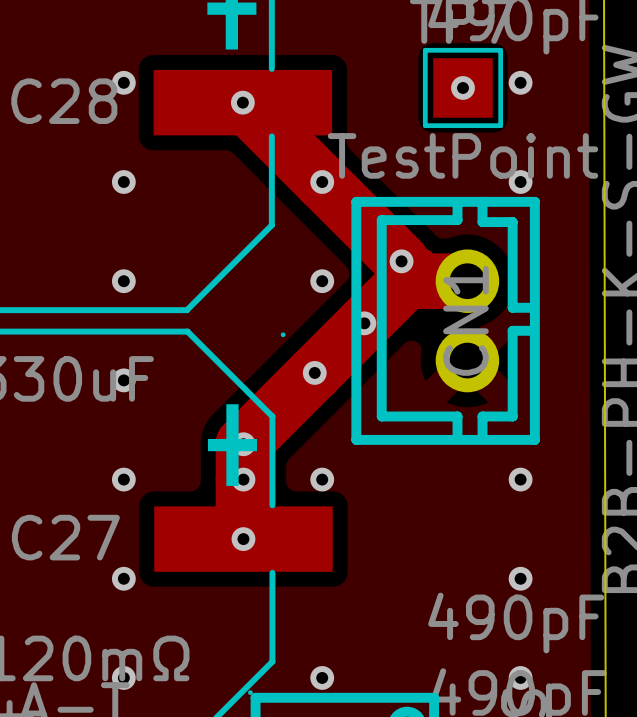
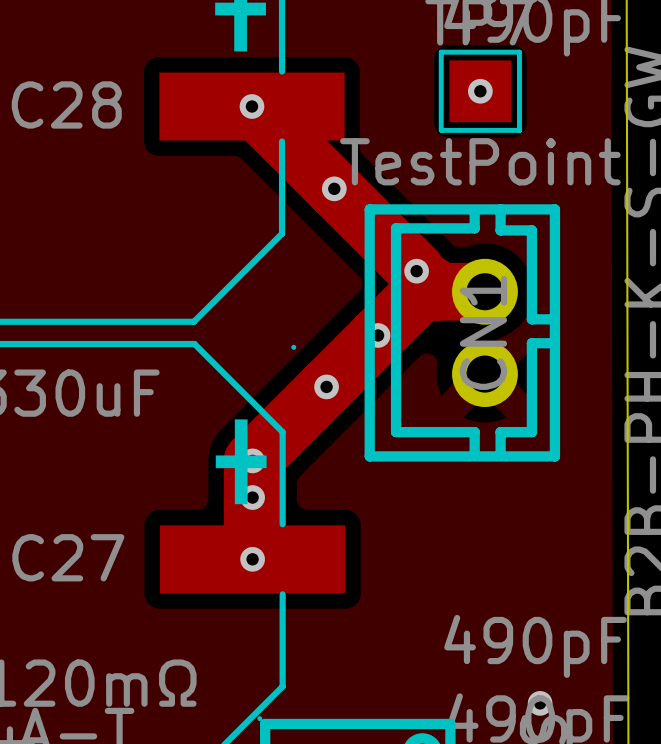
via: (123, 82) -> none
via: (520, 82) -> none
via: (123, 182) -> none
via: (520, 182) -> none
via: (123, 281) -> none
via: (322, 281) -> none
via: (123, 380) -> none
via: (123, 479) -> none
via: (322, 479) -> none
via: (520, 479) -> none
via: (123, 578) -> none
via: (520, 578) -> none
via: (123, 677) -> none
via: (322, 677) -> none

